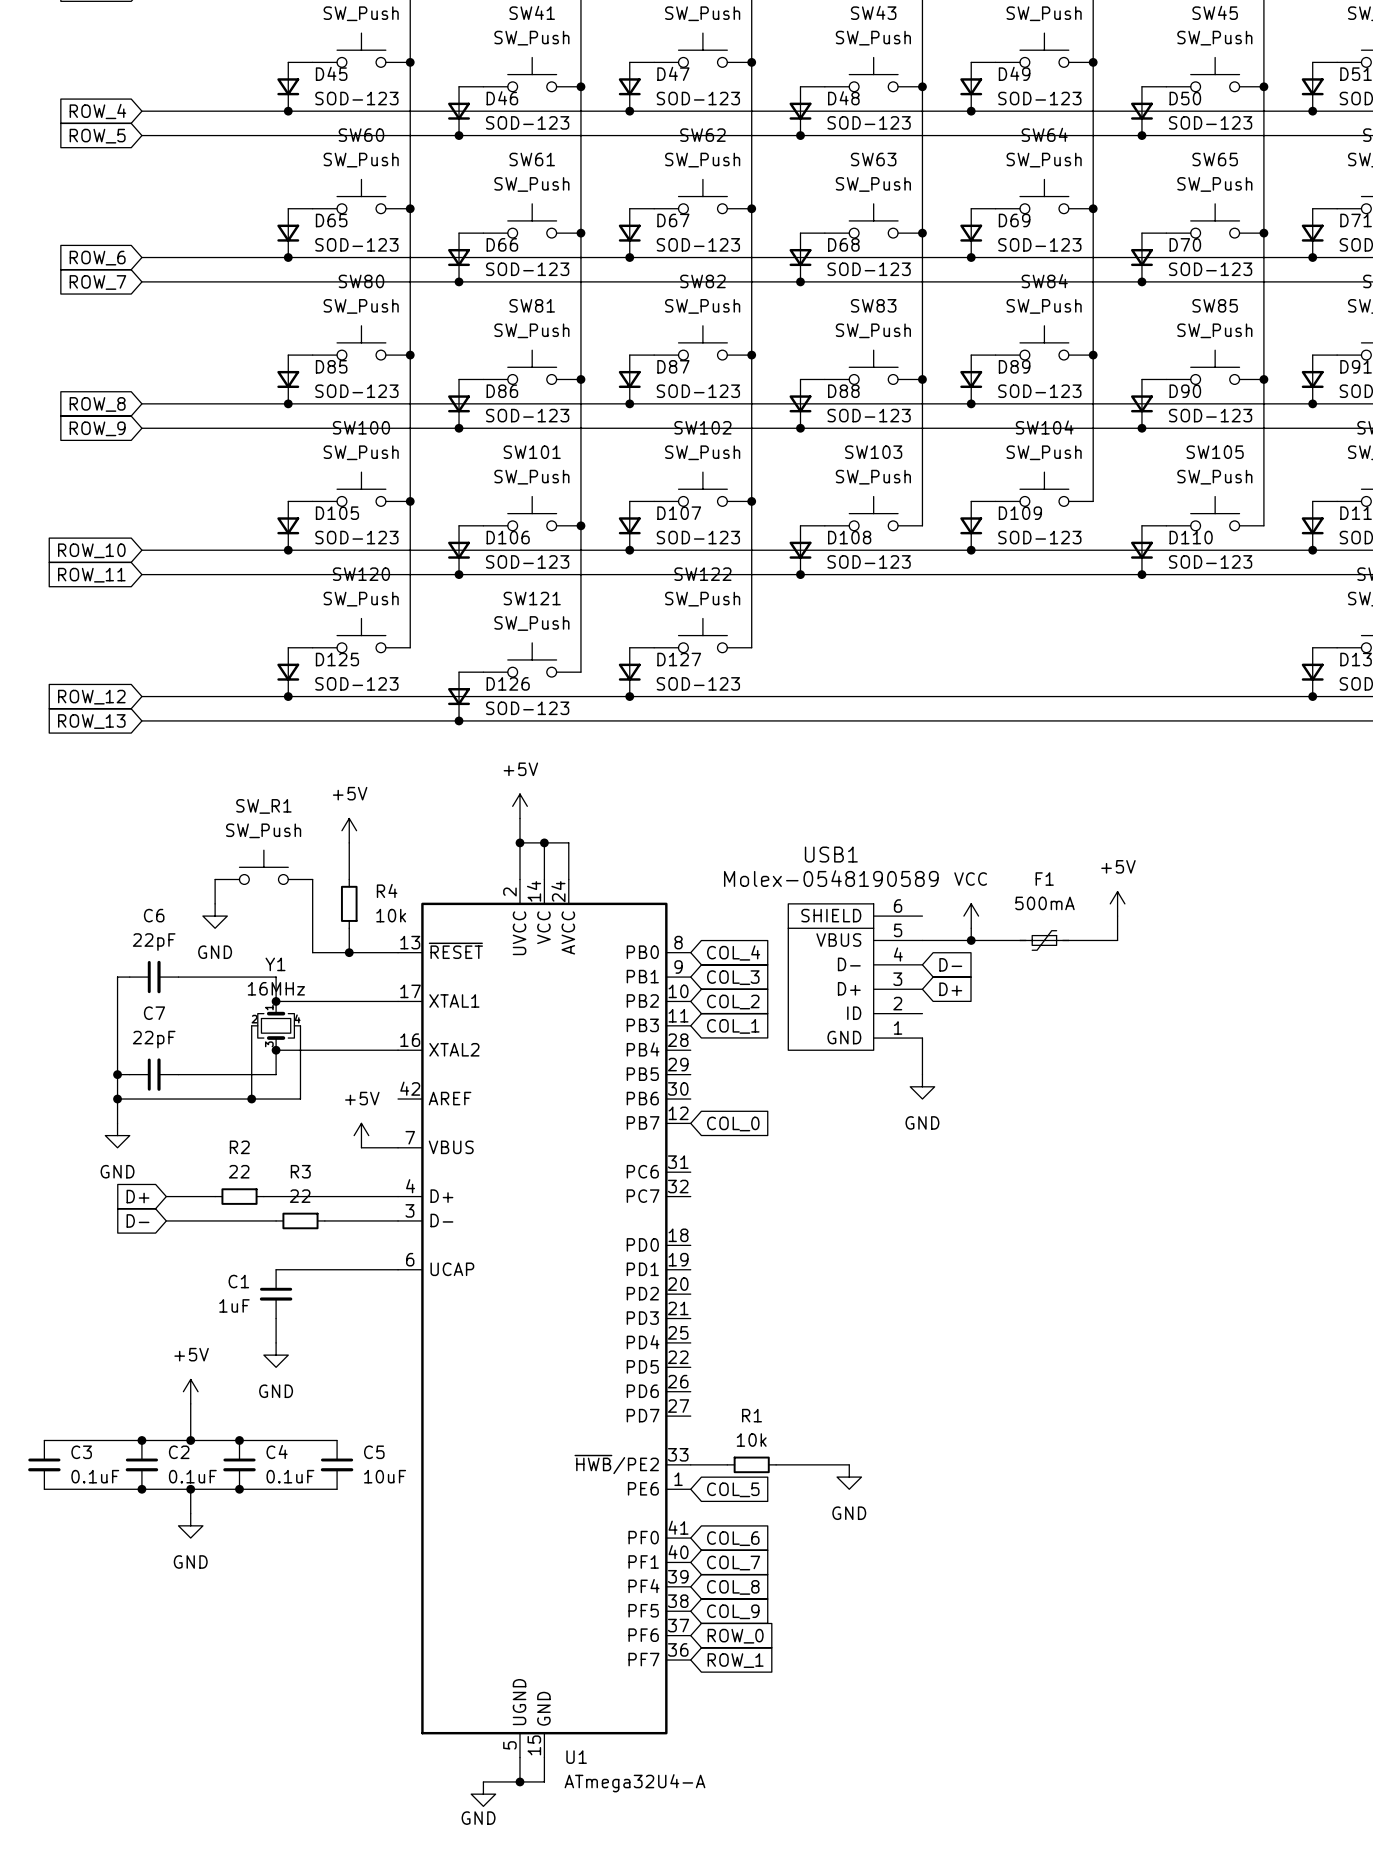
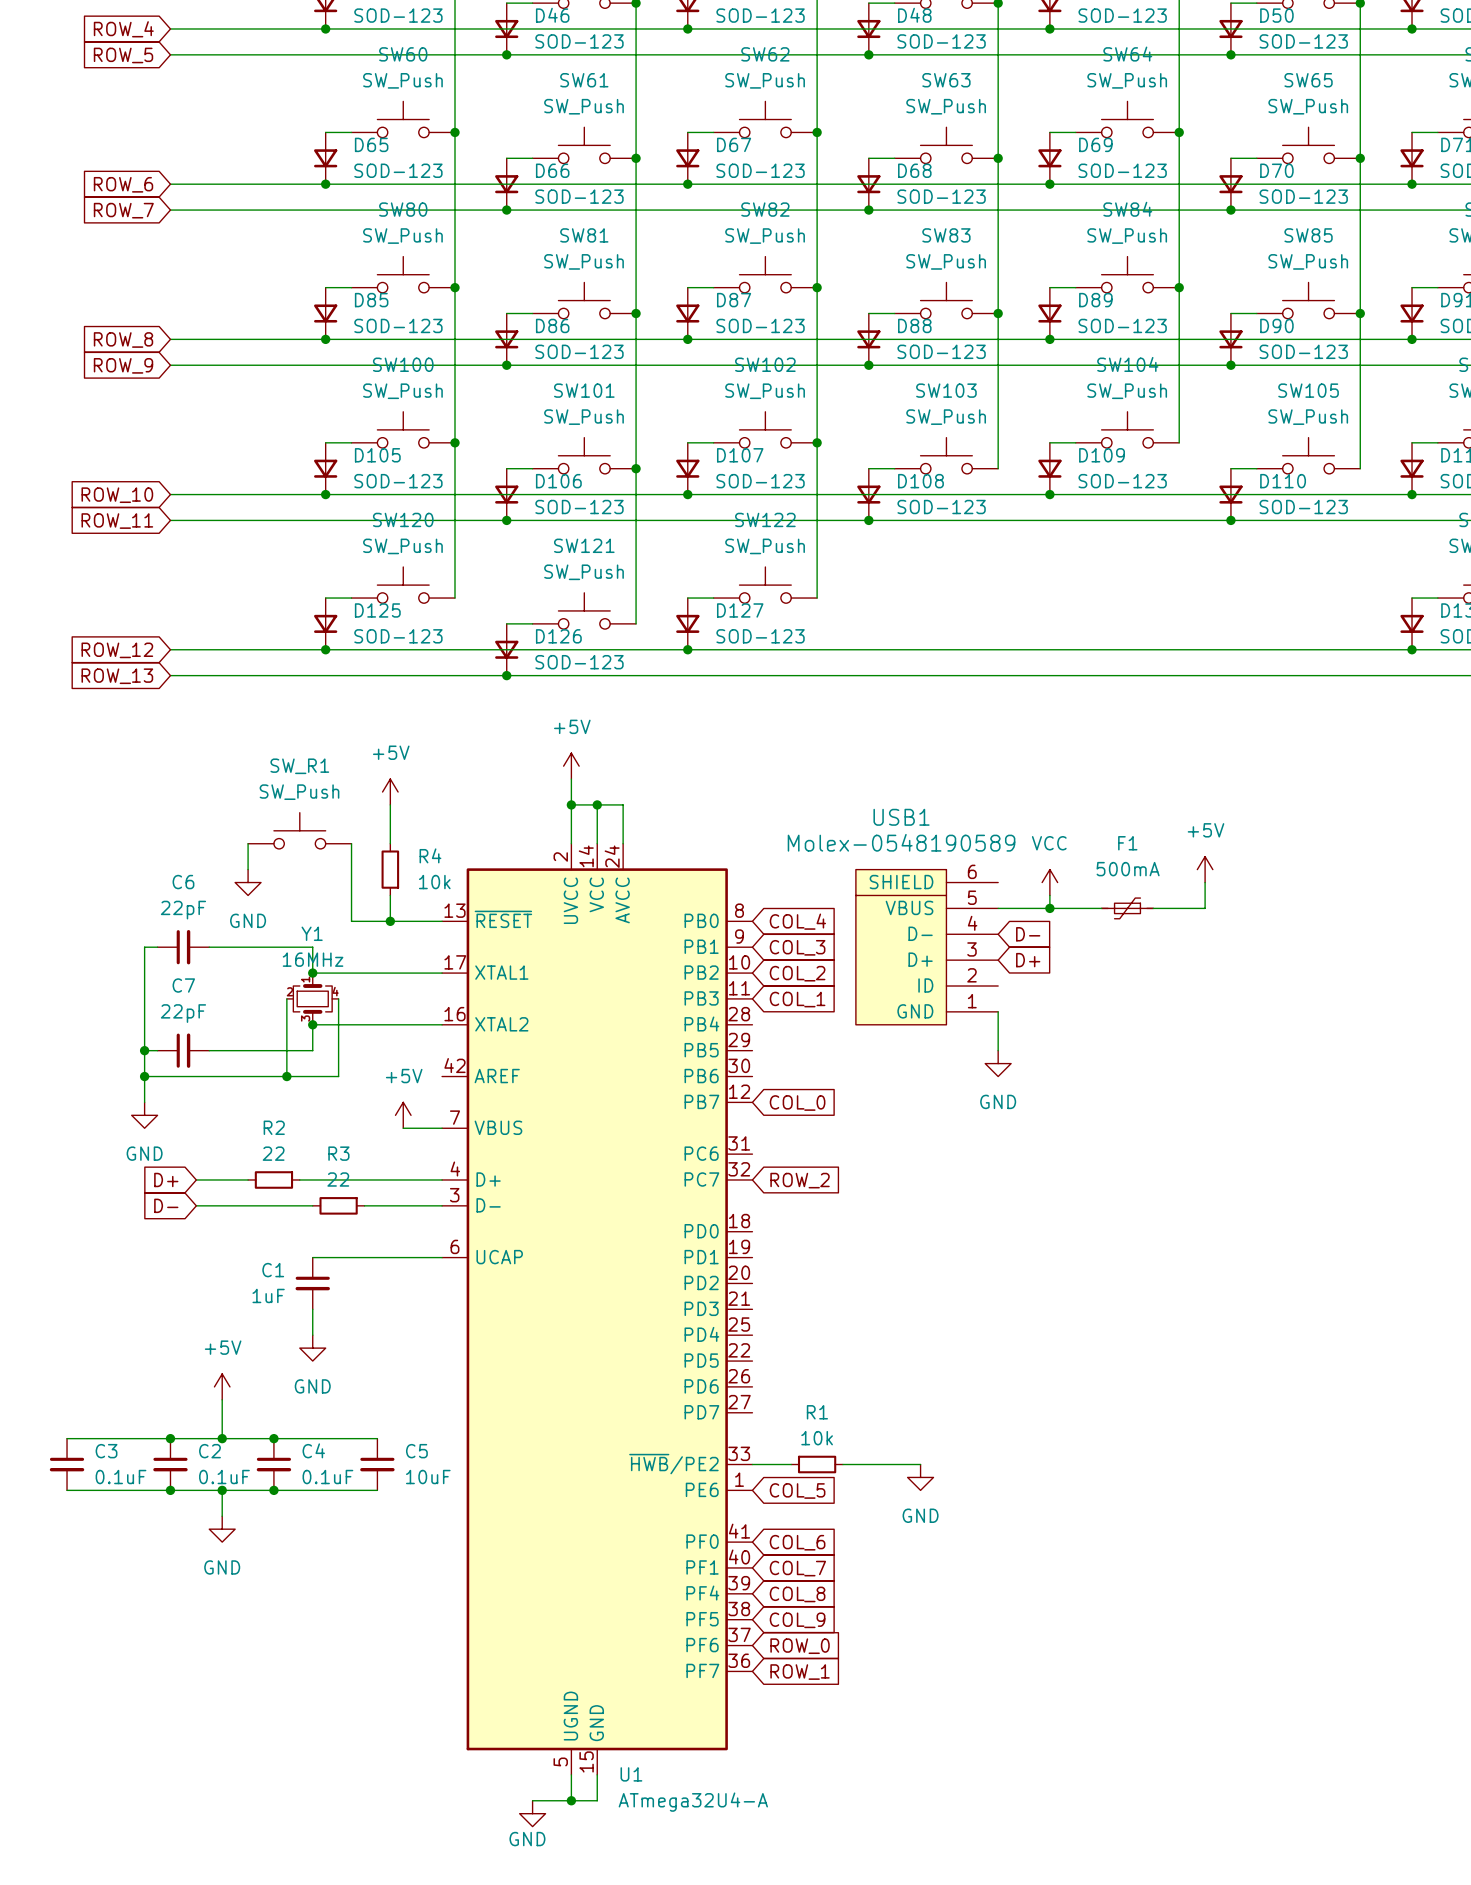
global label: none -> ROW_2 (800, 1180)

